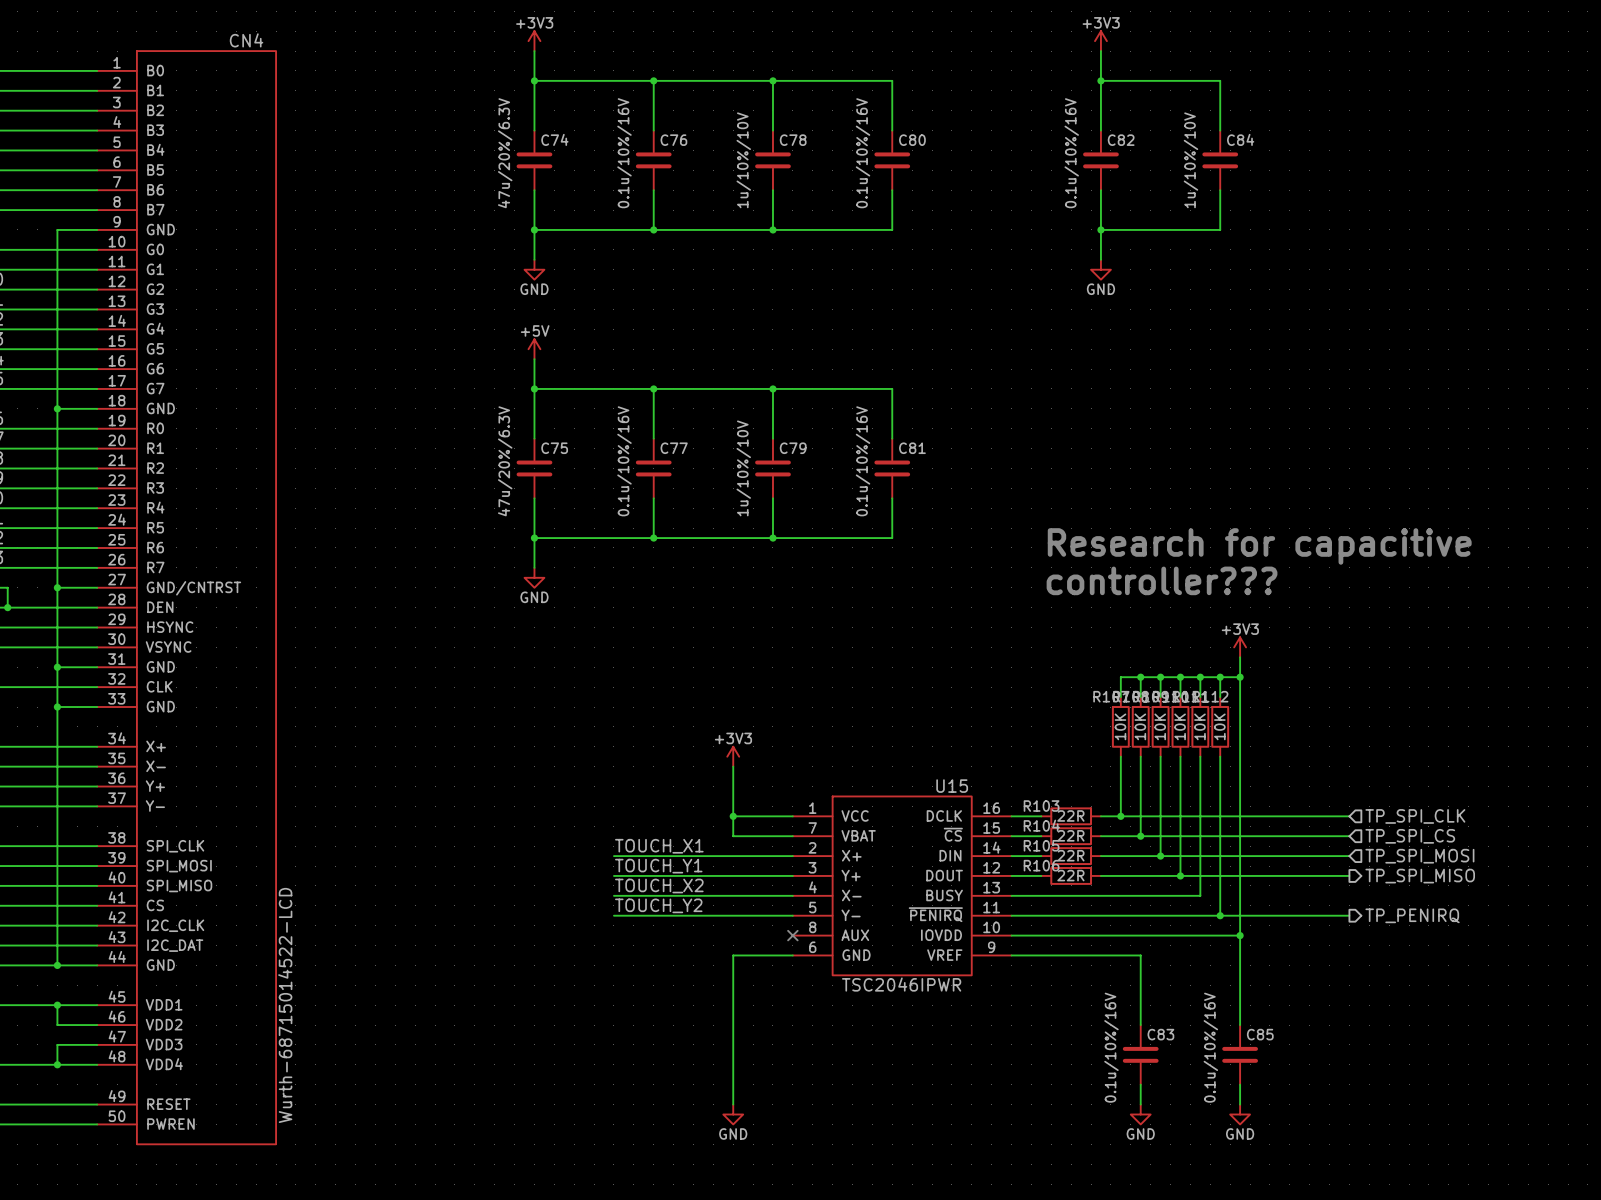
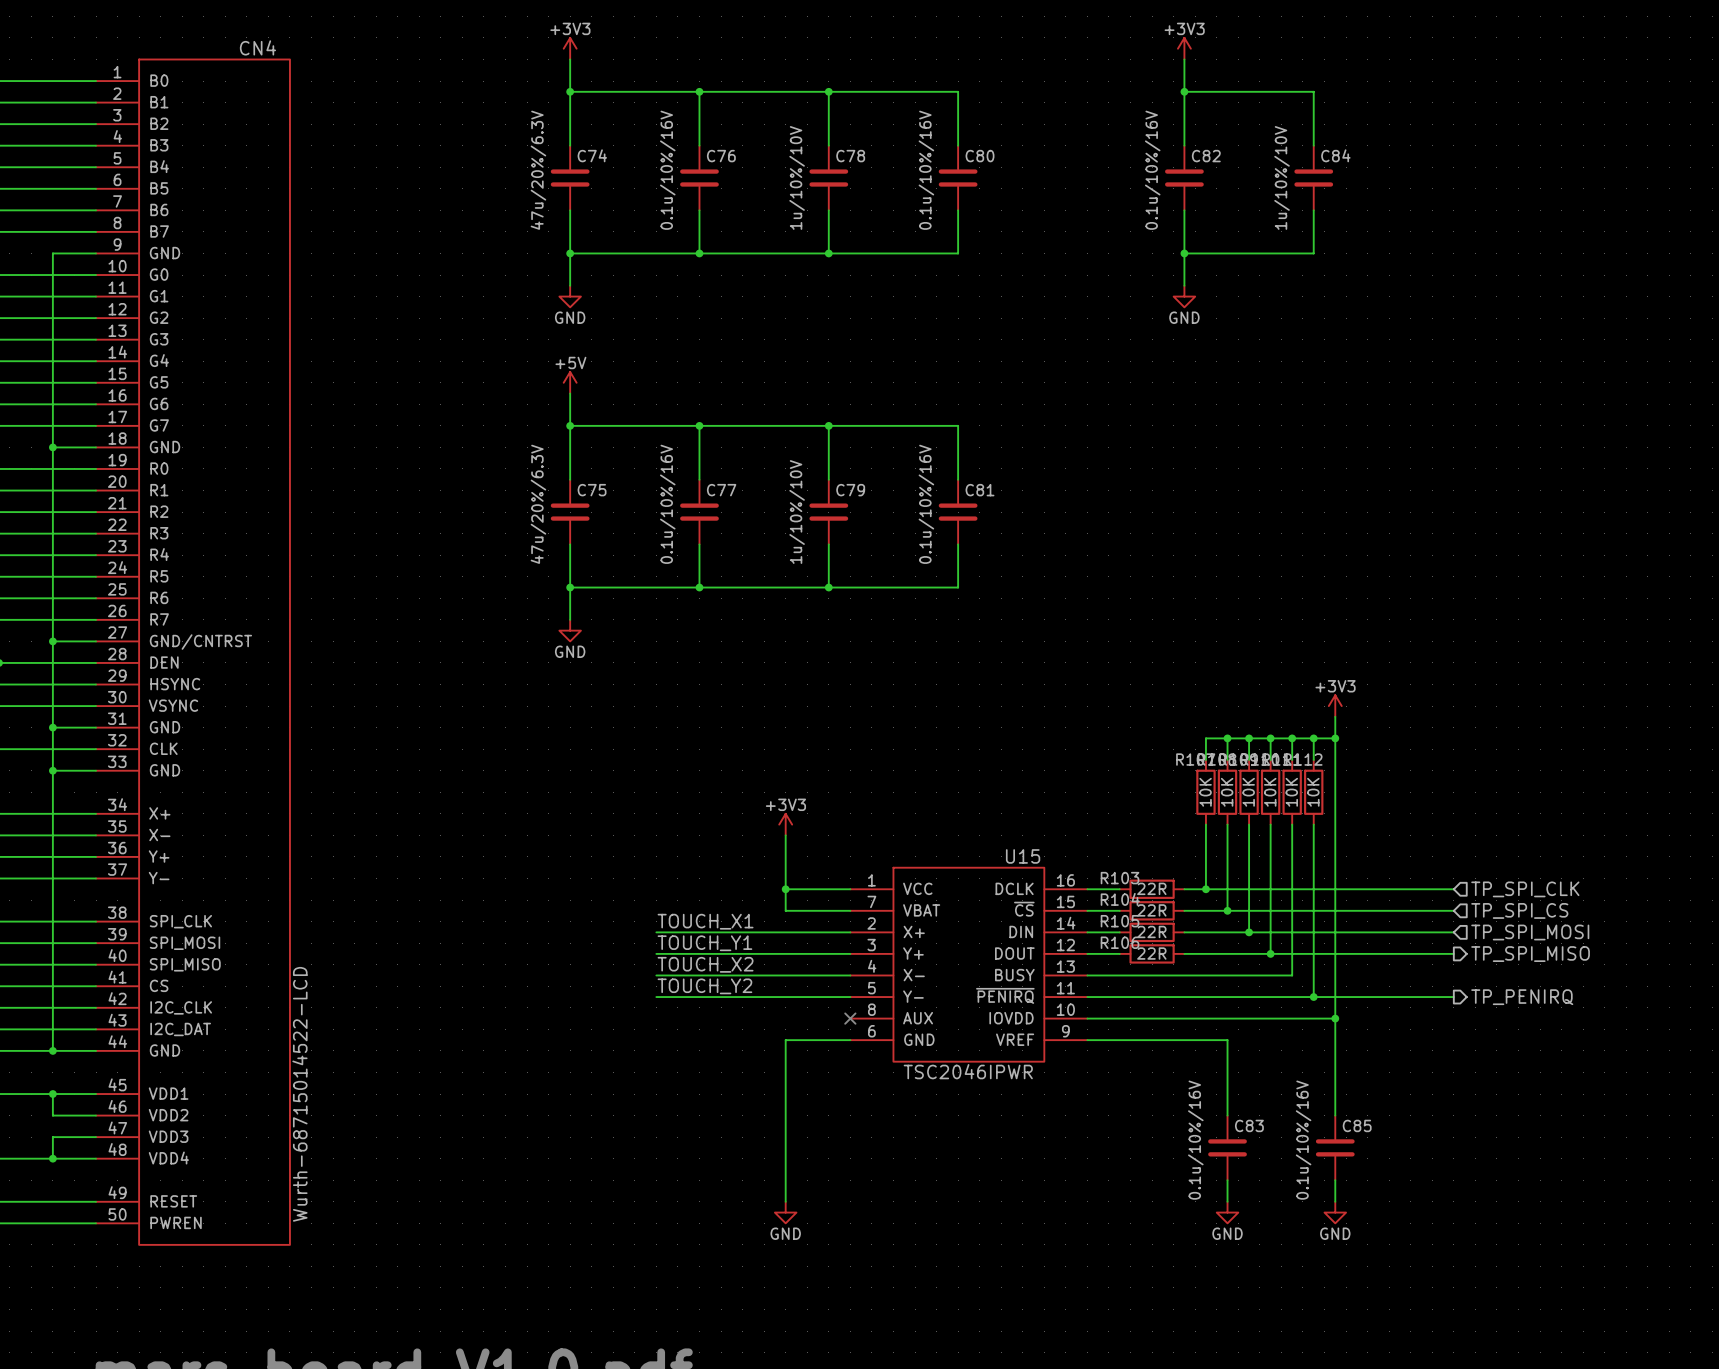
text: Research for capacitive (1259, 546) -> none
text: controller??? (1162, 580) -> none

